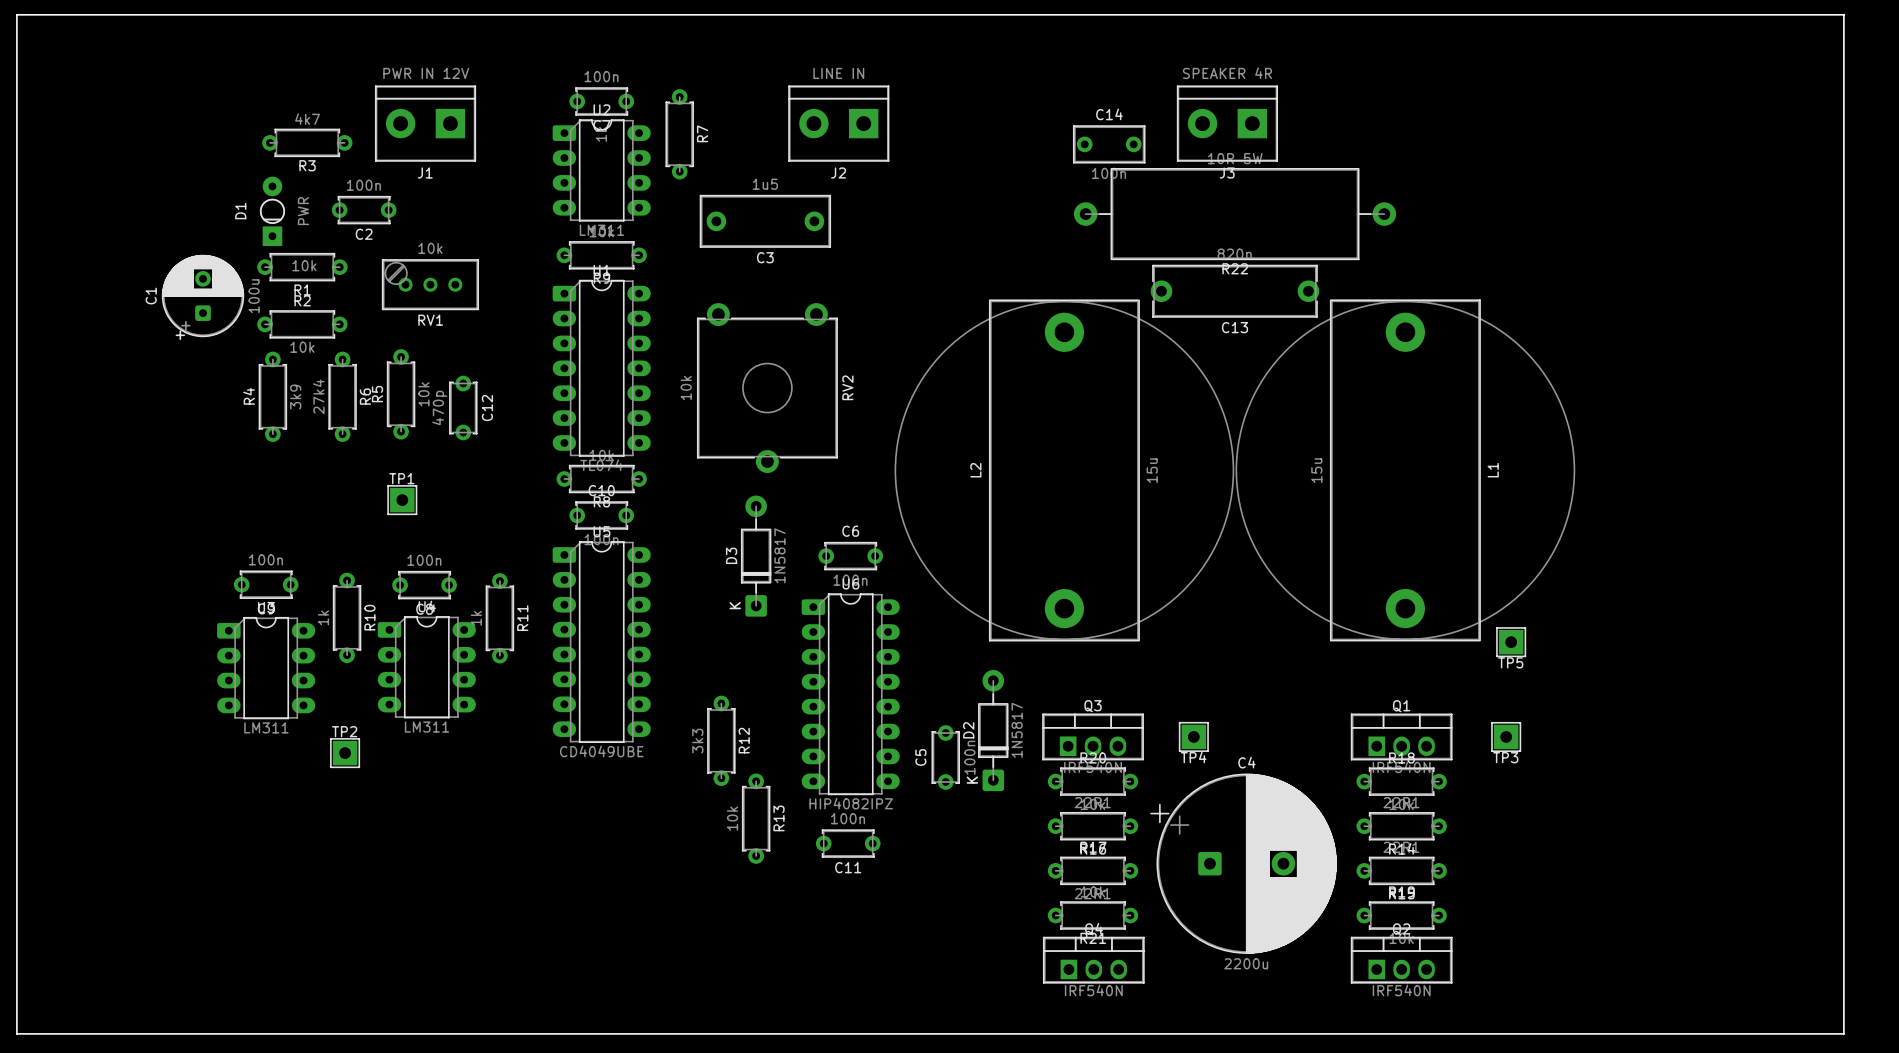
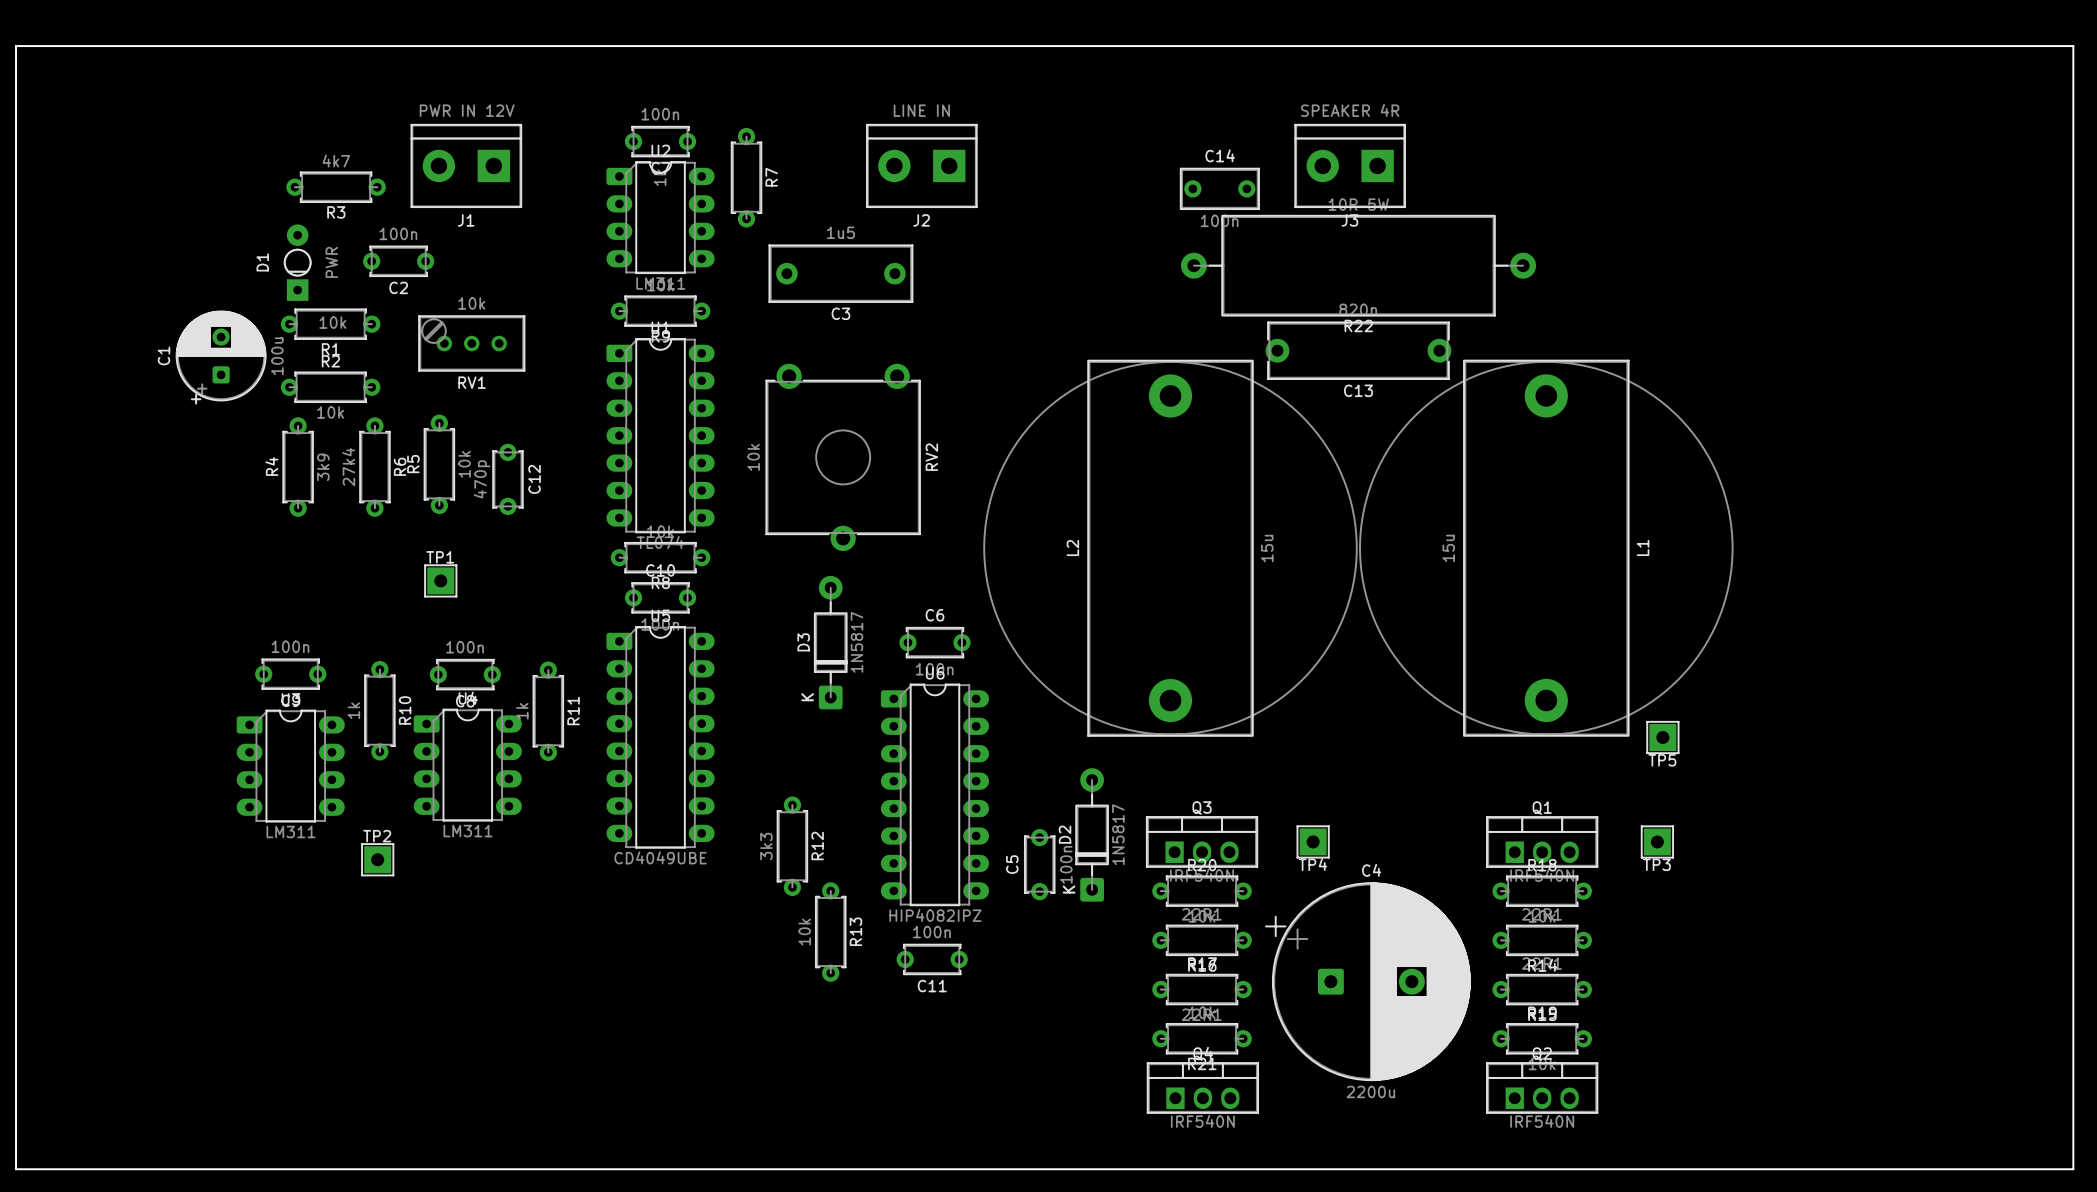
board edge: (1843, 14) (1843, 1033) -> (2029, 46) (2073, 46) (2073, 1169) (2029, 1169)

